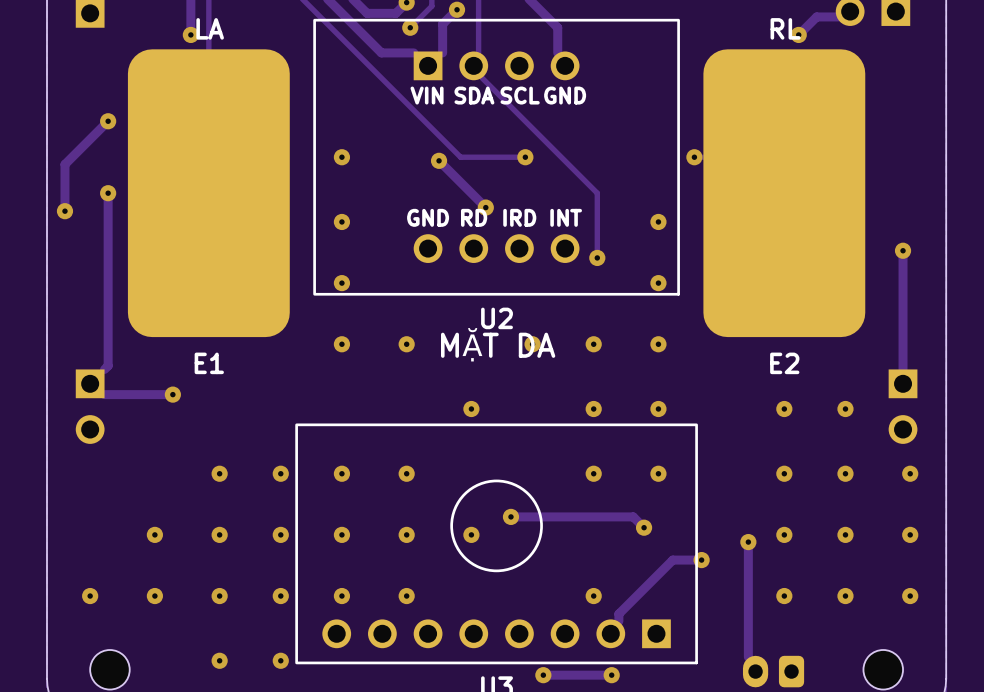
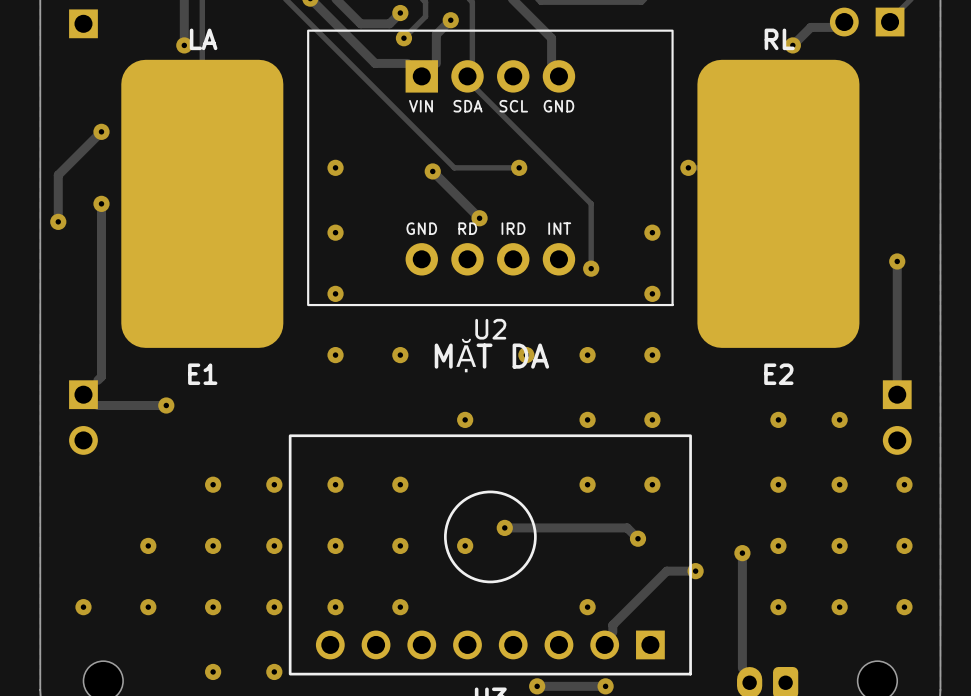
U2 footprint: [313, 18, 680, 296] -> [307, 29, 674, 307]

